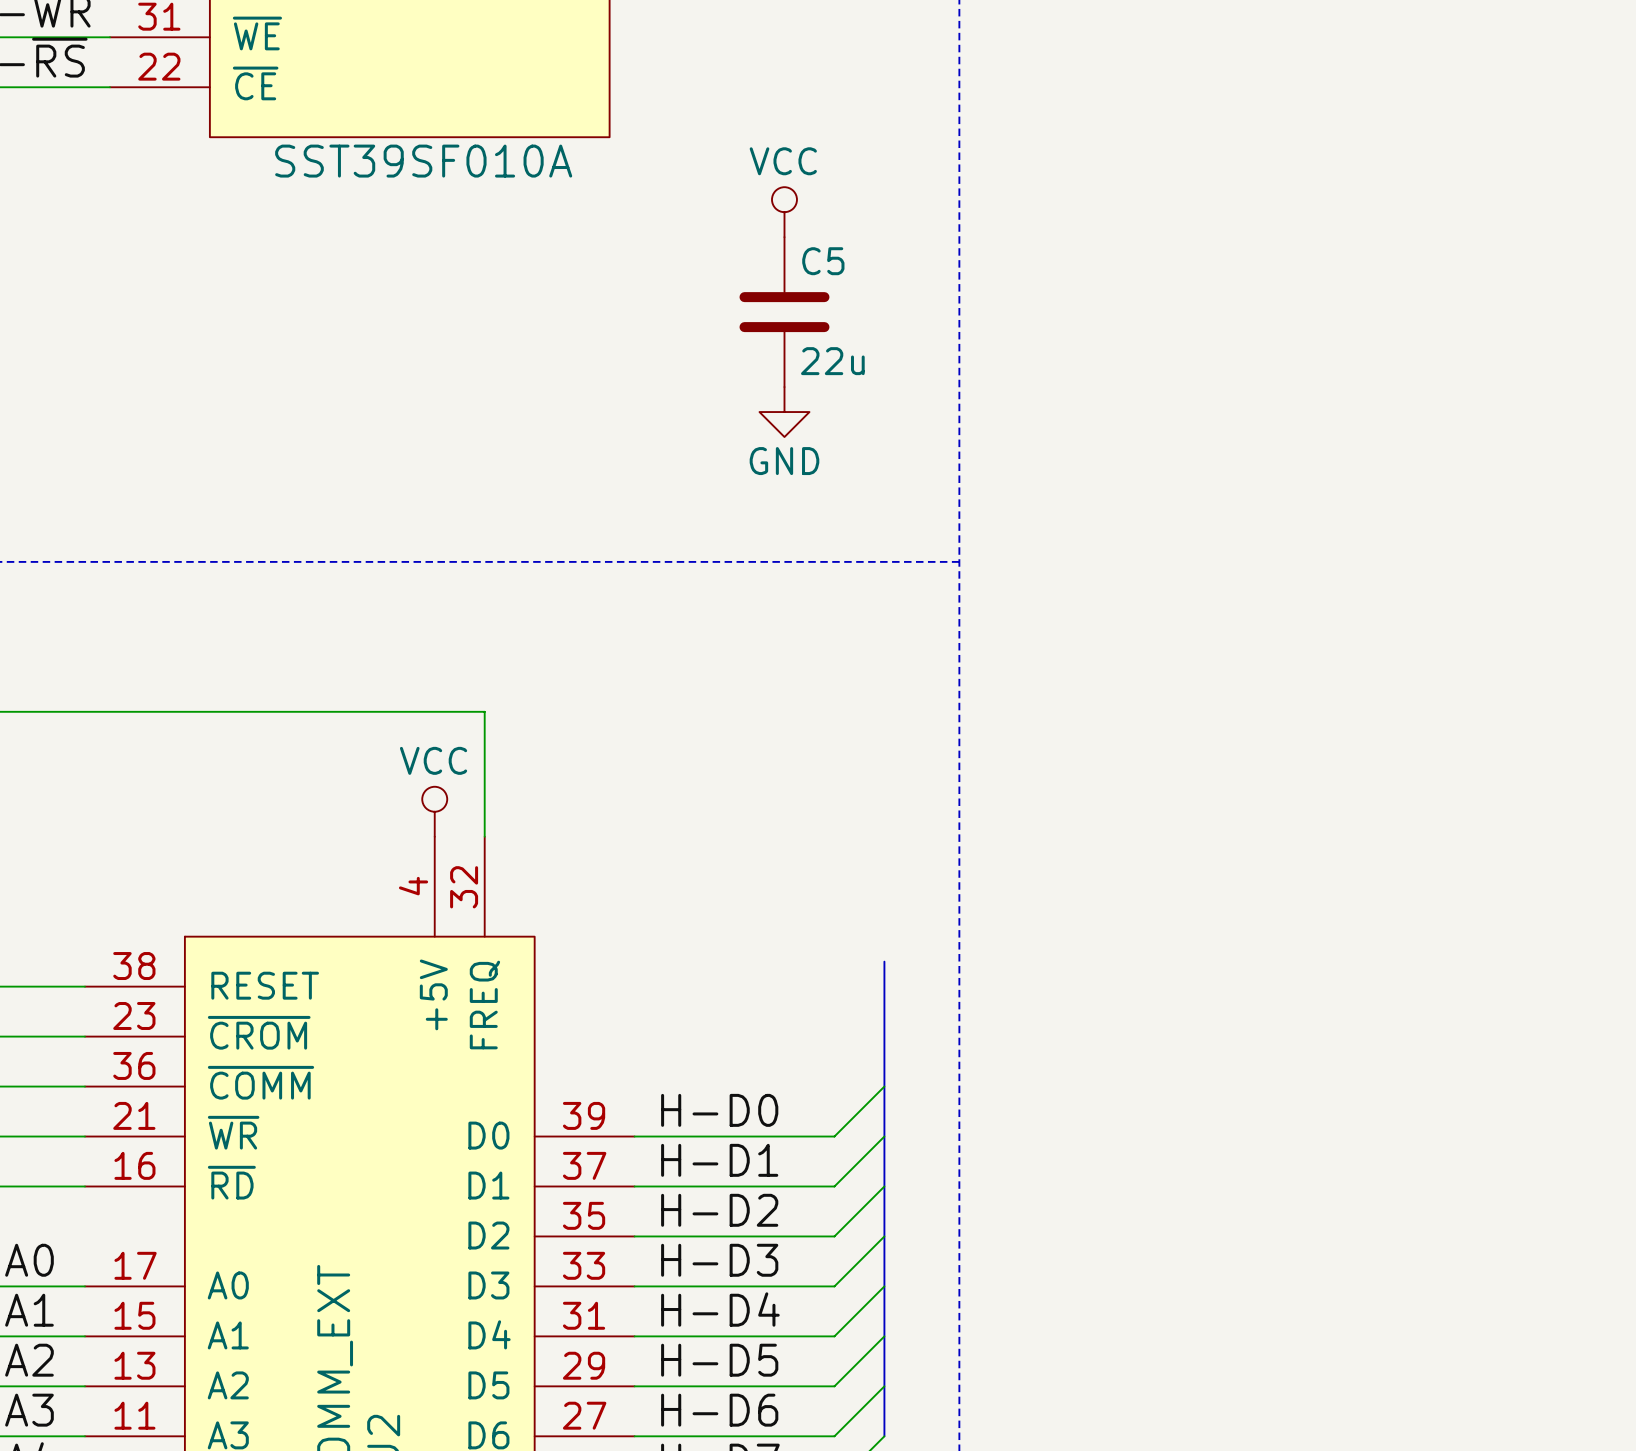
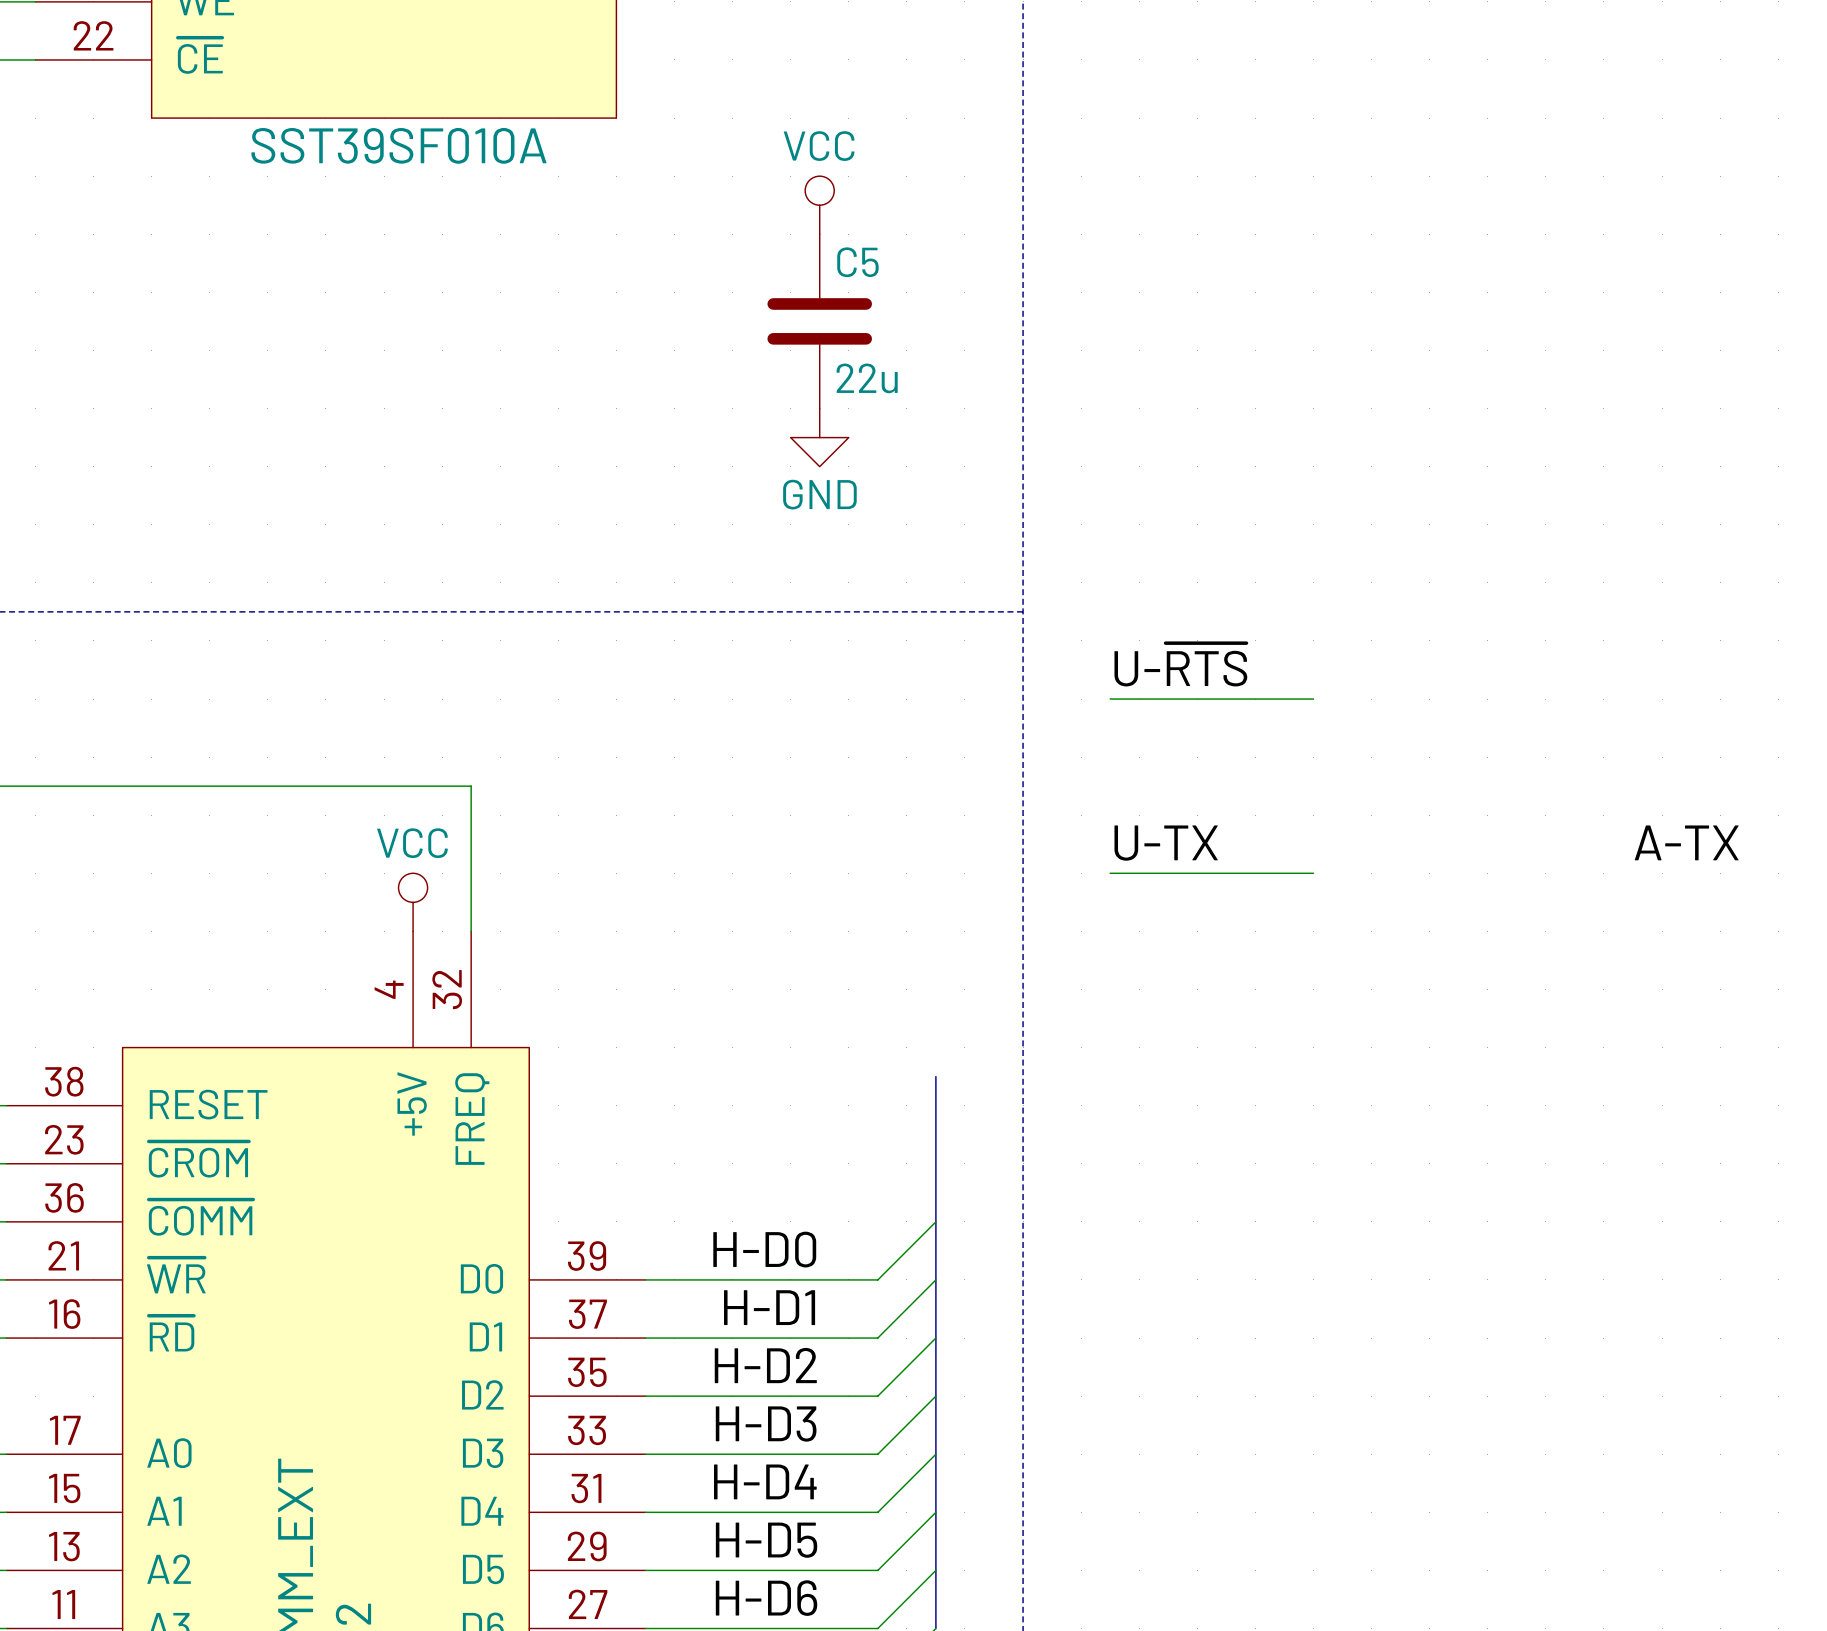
label: none -> U-~{RTS} (1180, 664)
wire: none -> (1110, 699) (1313, 699)
label: none -> U-TX (1166, 843)
label: none -> A-TX (1686, 842)
wire: none -> (1110, 873) (1313, 873)

